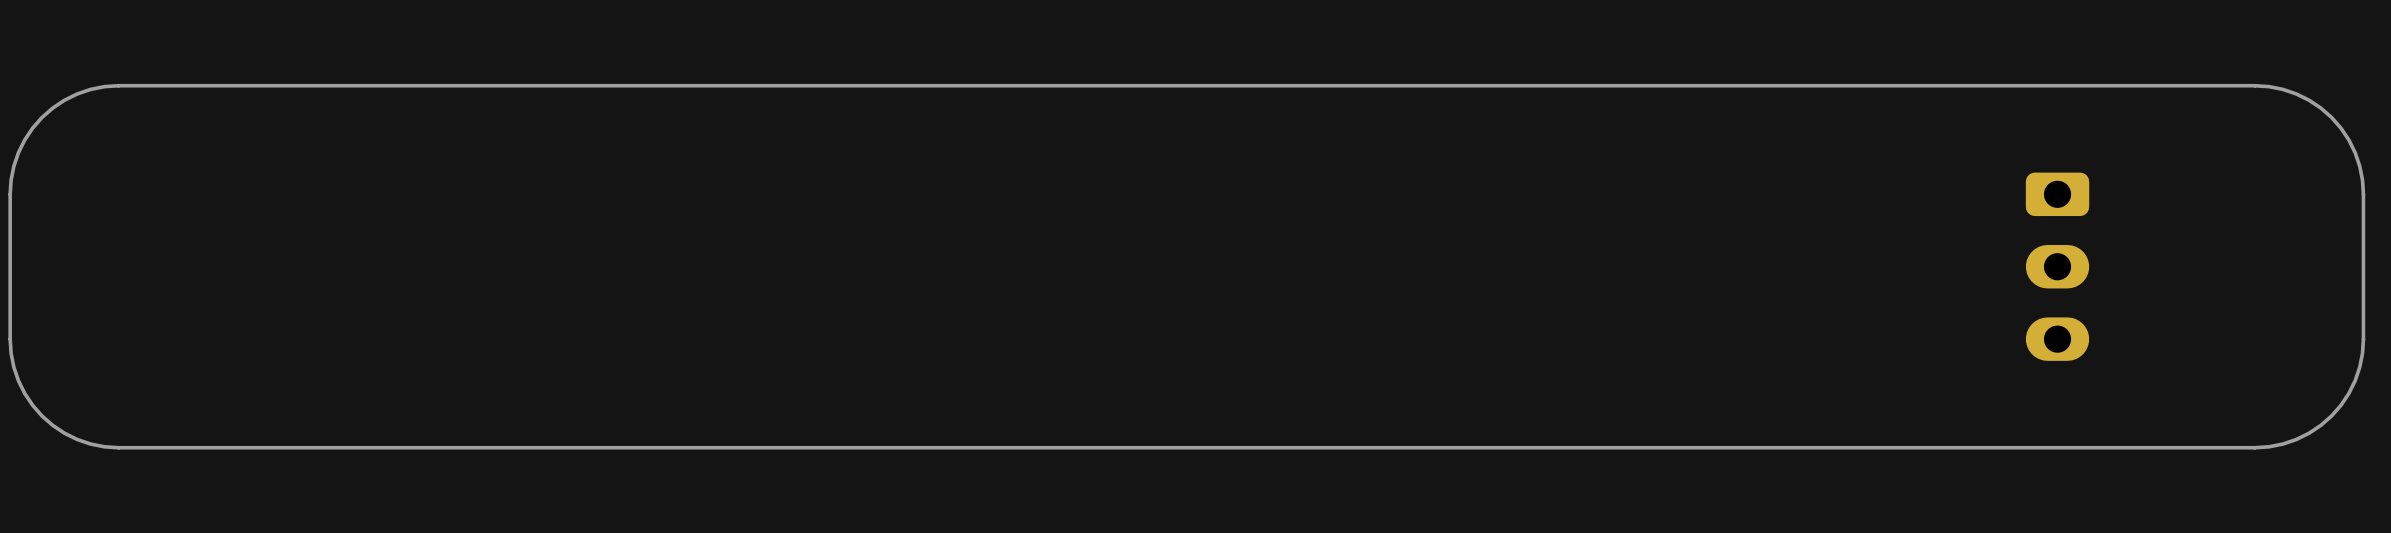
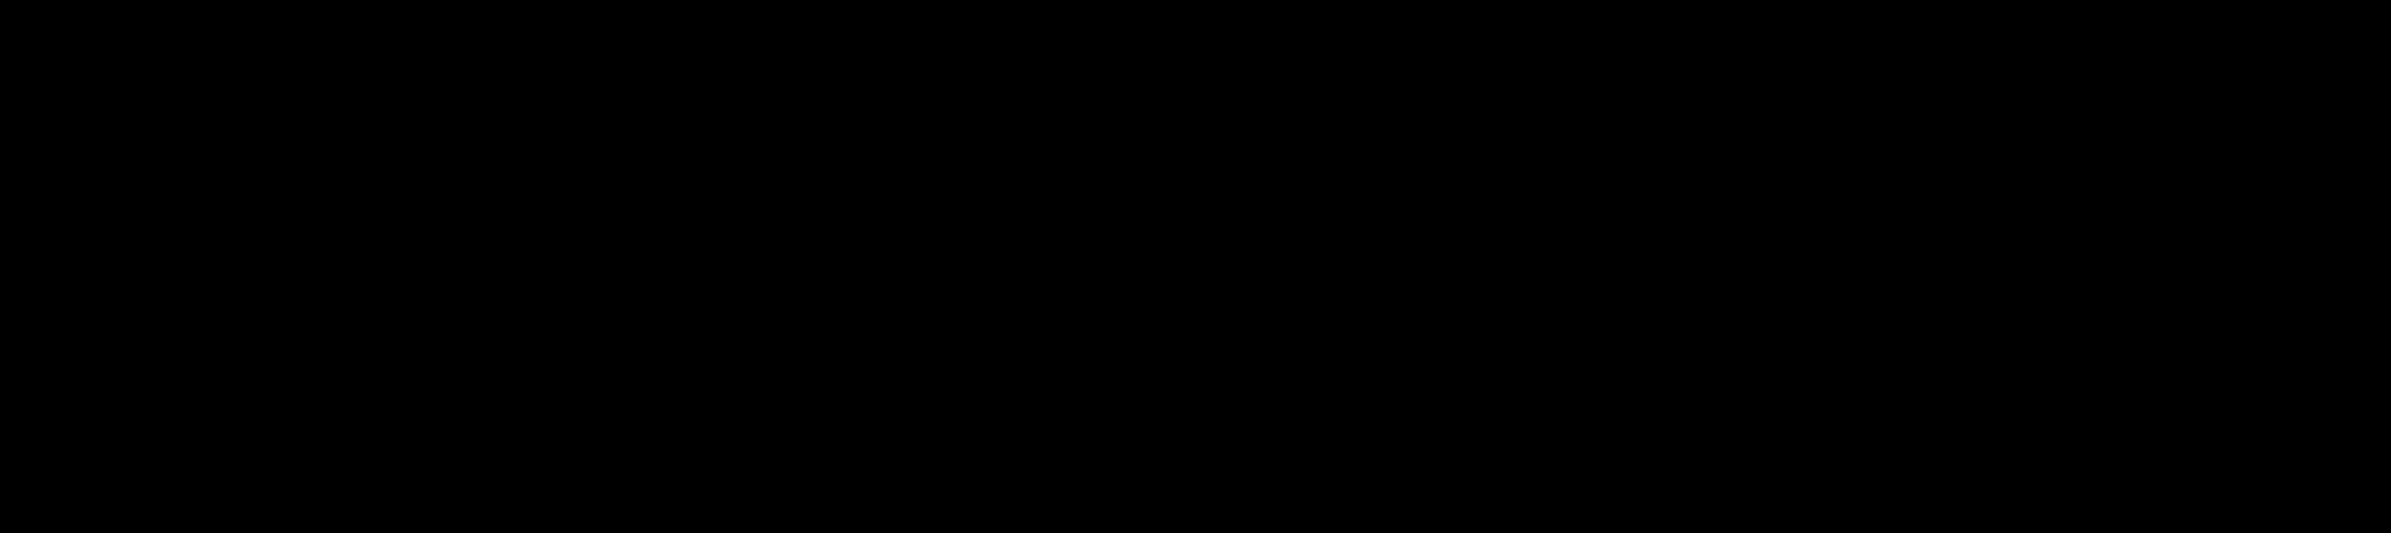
board edge: (2254, 85) (104, 86) (77, 93) (52, 108) (32, 128) (18, 152) (11, 180) (10, 194) (11, 353) (18, 380) (32, 405) (41, 415) (64, 433) (77, 439) (90, 444) (118, 447) (2269, 446) (2296, 439) (2320, 425) (2341, 405) (2355, 380) (2359, 367) (2363, 339) (2363, 194) (2362, 180) (2355, 152) (2348, 140) (2331, 117) (2309, 100) (2296, 93) (2269, 86) (2254, 85) -> none
part: (2057, 266) -> none

